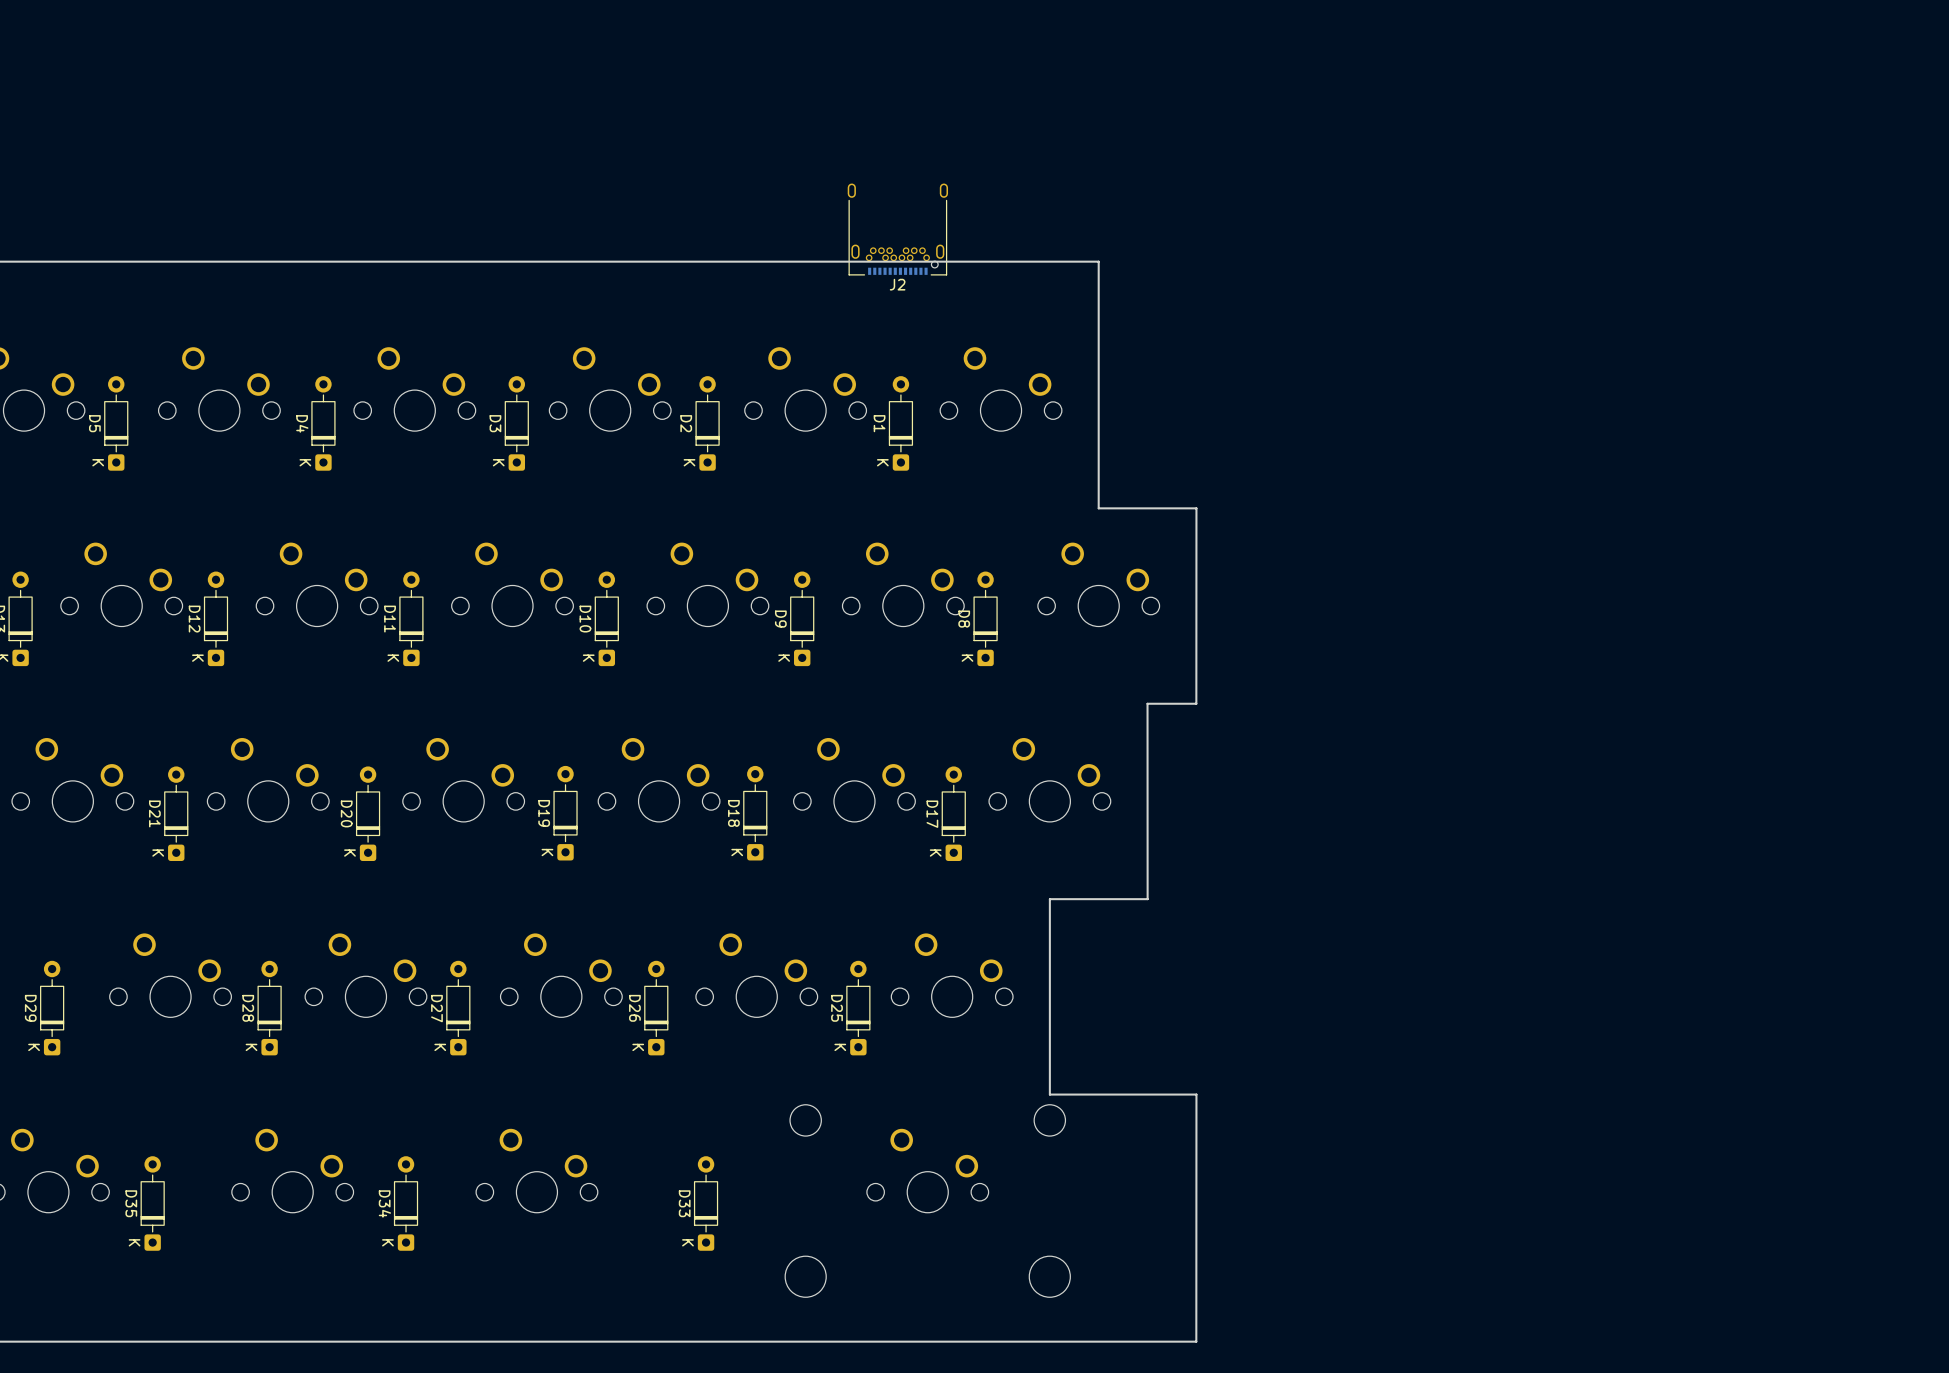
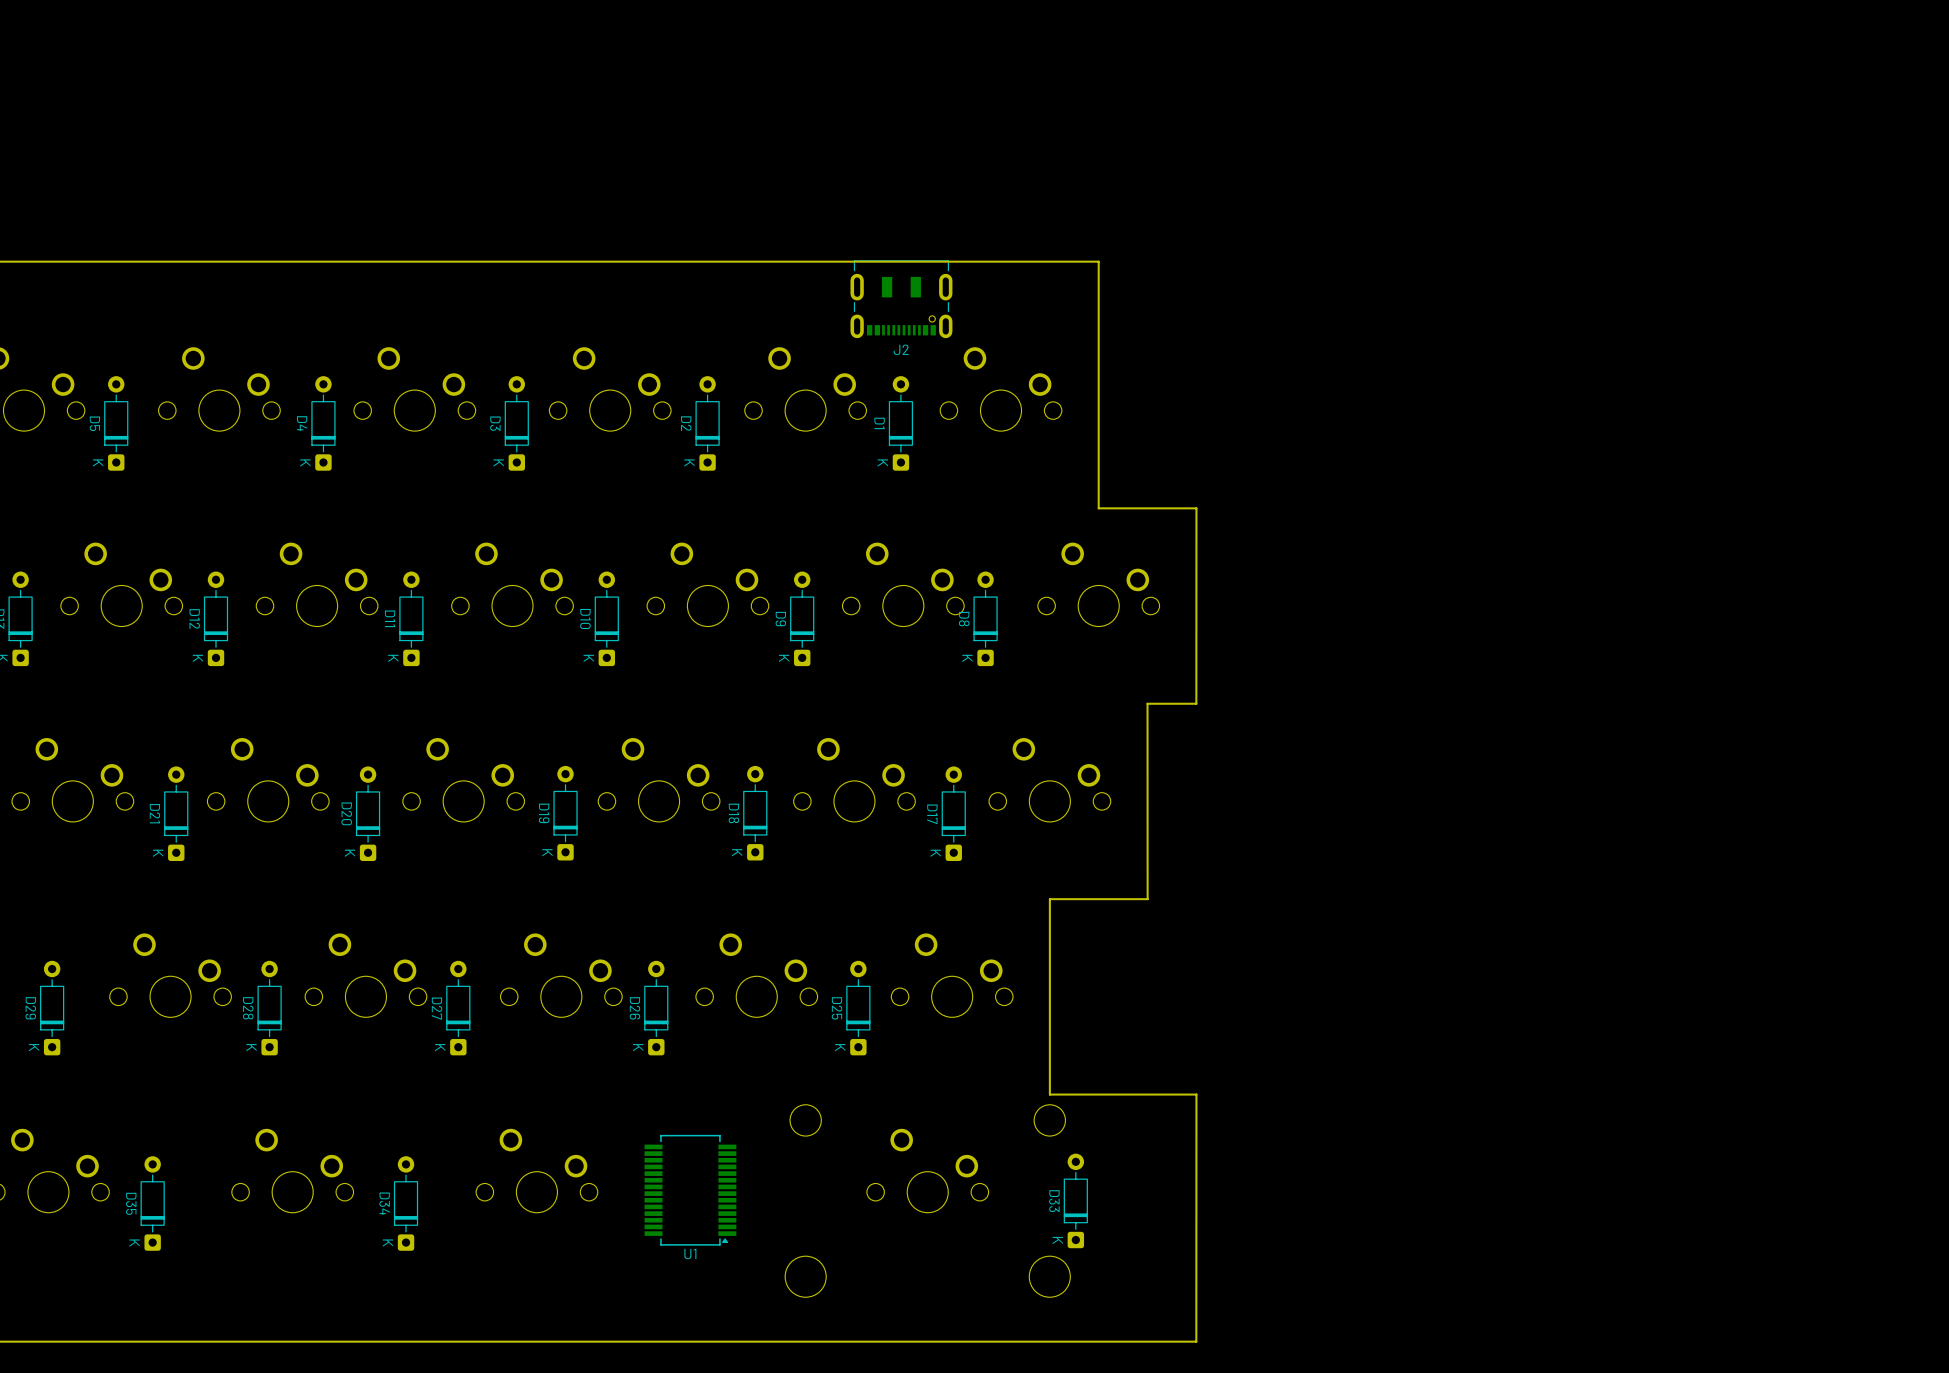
J2 footprint: [847, 183, 949, 276] -> [850, 260, 953, 339]
U1: none -> (690, 1190)
D33 position: (706, 1203) -> (1075, 1200)

